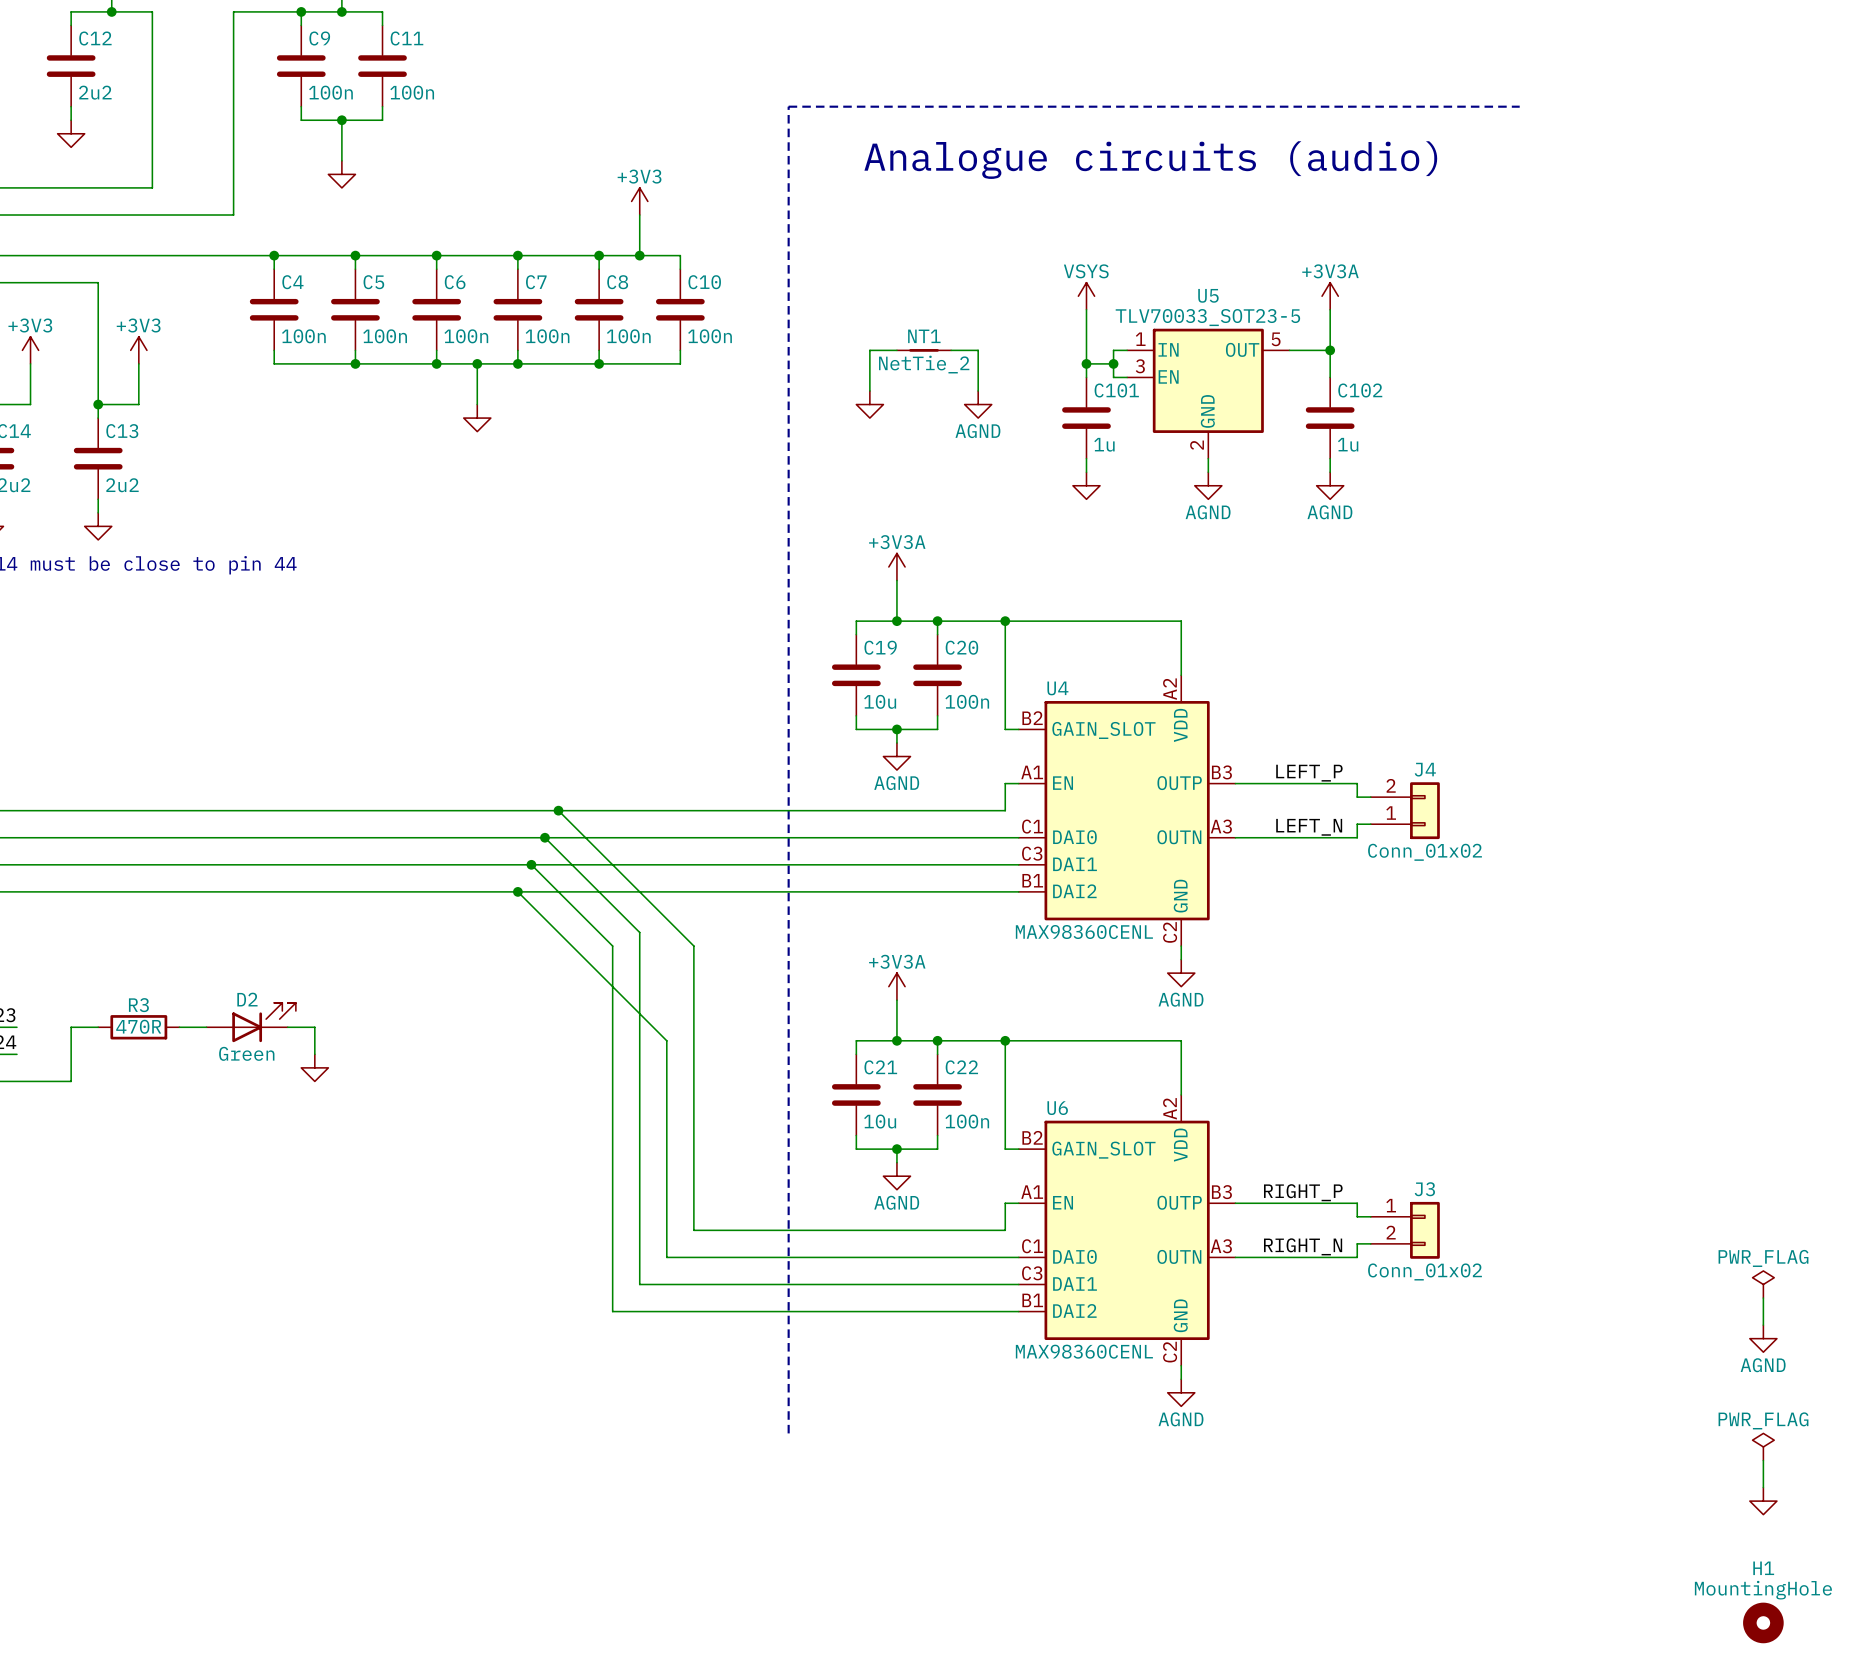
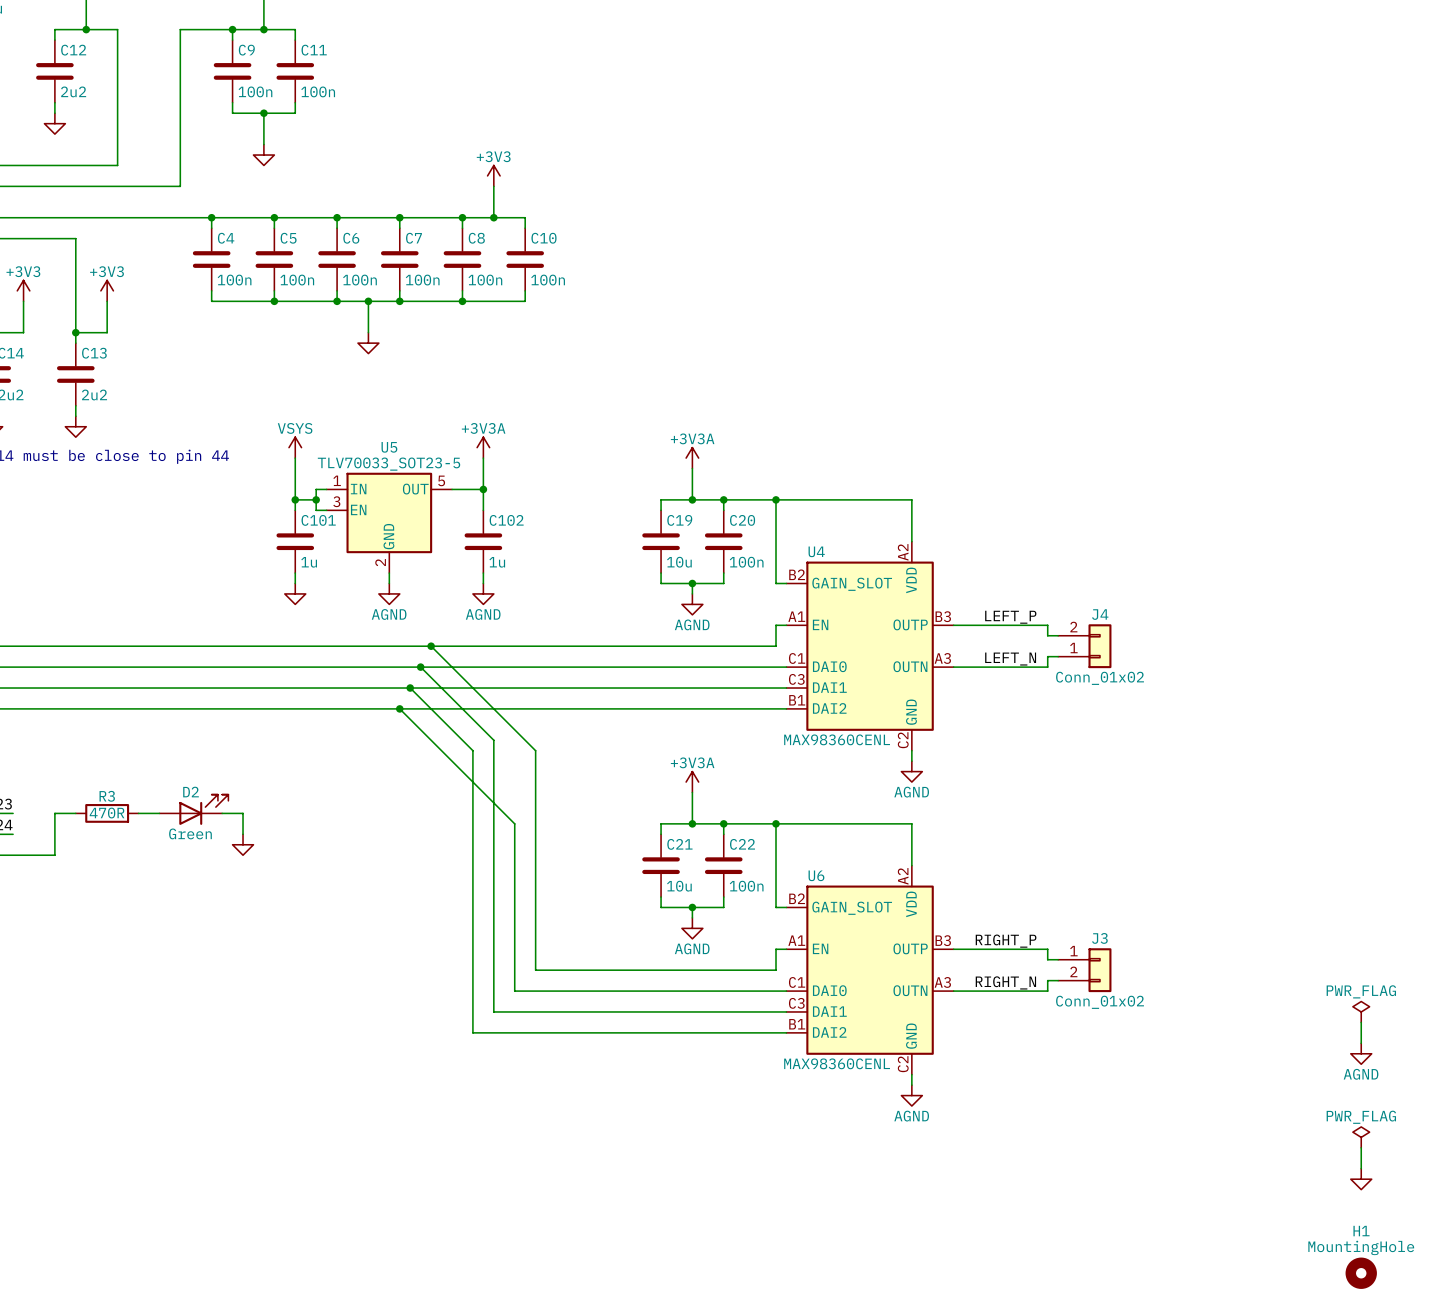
line: (1519, 106) (788, 106) (788, 1433) -> none
text: Analogue circuits (audio) (1150, 160) -> none
power symbol: VSYS (1086, 296) -> none
power symbol: +3V3A (1330, 296) -> none
wire: (1086, 309) (1086, 377) -> none
wire: (1330, 309) (1330, 377) -> none
wire: (896, 350) (869, 350) (869, 390) -> none
NT1: NetTie_2 (924, 350) -> none
wire: (951, 350) (978, 350) (978, 390) -> none
wire: (1127, 350) (1113, 350) (1113, 377) (1127, 377) -> none
wire: (1289, 350) (1330, 350) -> none
junction: (1330, 350) -> none
wire: (1086, 363) (1113, 363) -> none
junction: (1086, 363) -> none
junction: (1113, 363) -> none
U5 position: (1208, 393) -> (389, 522)
power symbol: (869, 404) -> none
power symbol: AGND (978, 404) -> none
C101 position: (1086, 418) -> (295, 541)
C102 position: (1330, 418) -> (483, 541)
wire: (1086, 458) (1086, 472) -> none
wire: (1208, 458) (1208, 472) -> none
wire: (1330, 458) (1330, 472) -> none
power symbol: (1086, 485) -> none
power symbol: AGND (1208, 485) -> none
power symbol: AGND (1330, 485) -> none
power symbol: none -> VSYS (295, 447)
power symbol: none -> +3V3A (483, 447)
wire: none -> (295, 458) (295, 510)
wire: none -> (483, 458) (483, 510)
wire: none -> (326, 489) (316, 489) (316, 510) (326, 510)
wire: none -> (452, 489) (483, 489)
junction: none -> (483, 489)
wire: none -> (295, 499) (316, 499)
junction: none -> (295, 499)
junction: none -> (316, 499)
wire: none -> (295, 573) (295, 583)
wire: none -> (389, 573) (389, 583)
wire: none -> (483, 573) (483, 583)
power symbol: none -> (295, 593)
power symbol: none -> AGND (389, 593)
power symbol: none -> AGND (483, 593)

